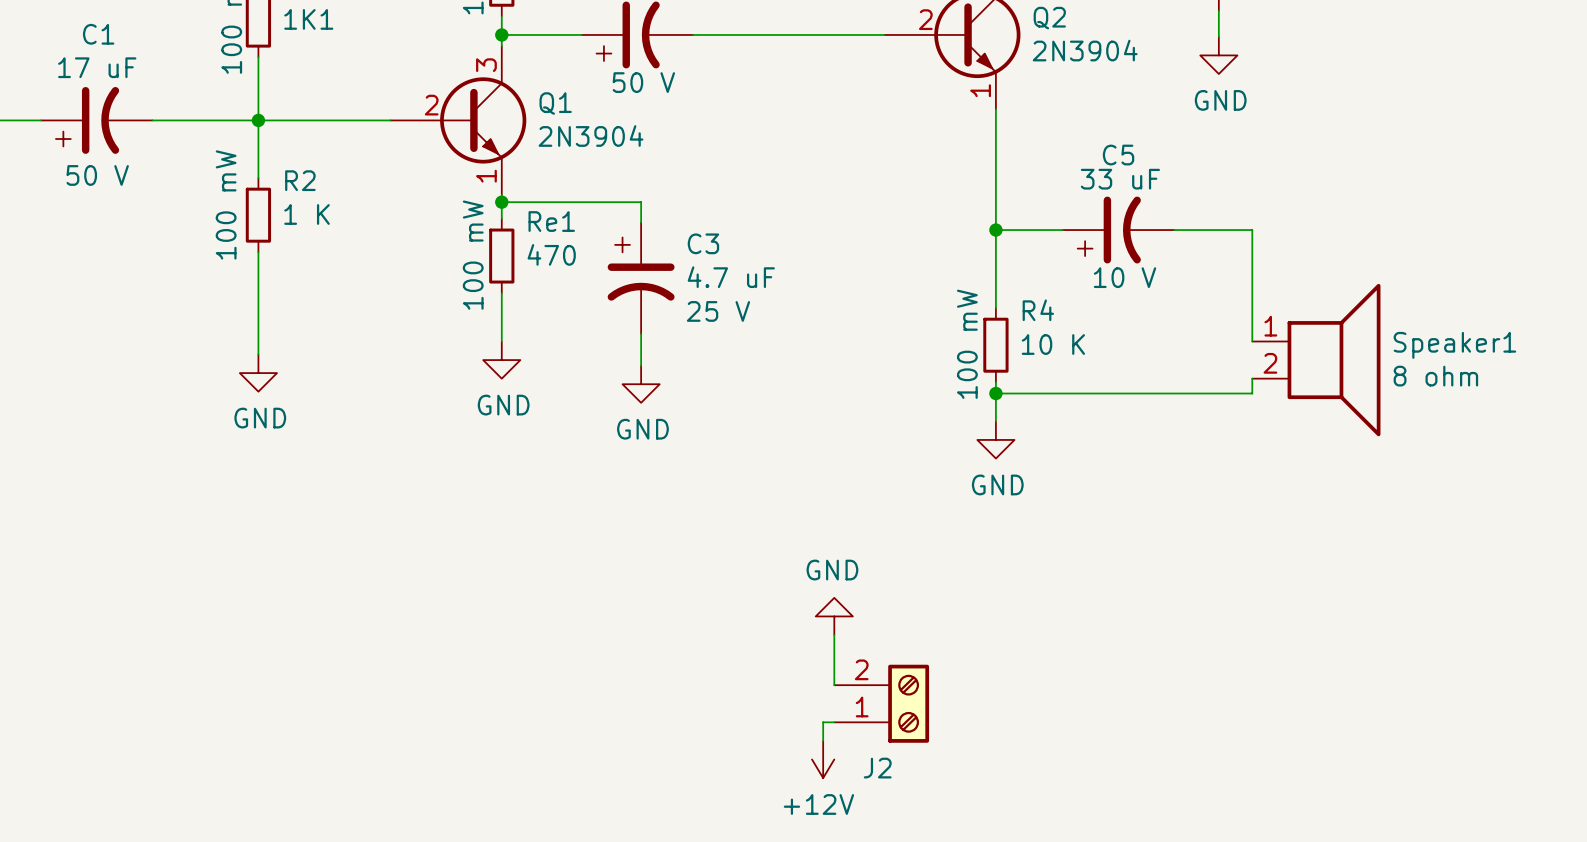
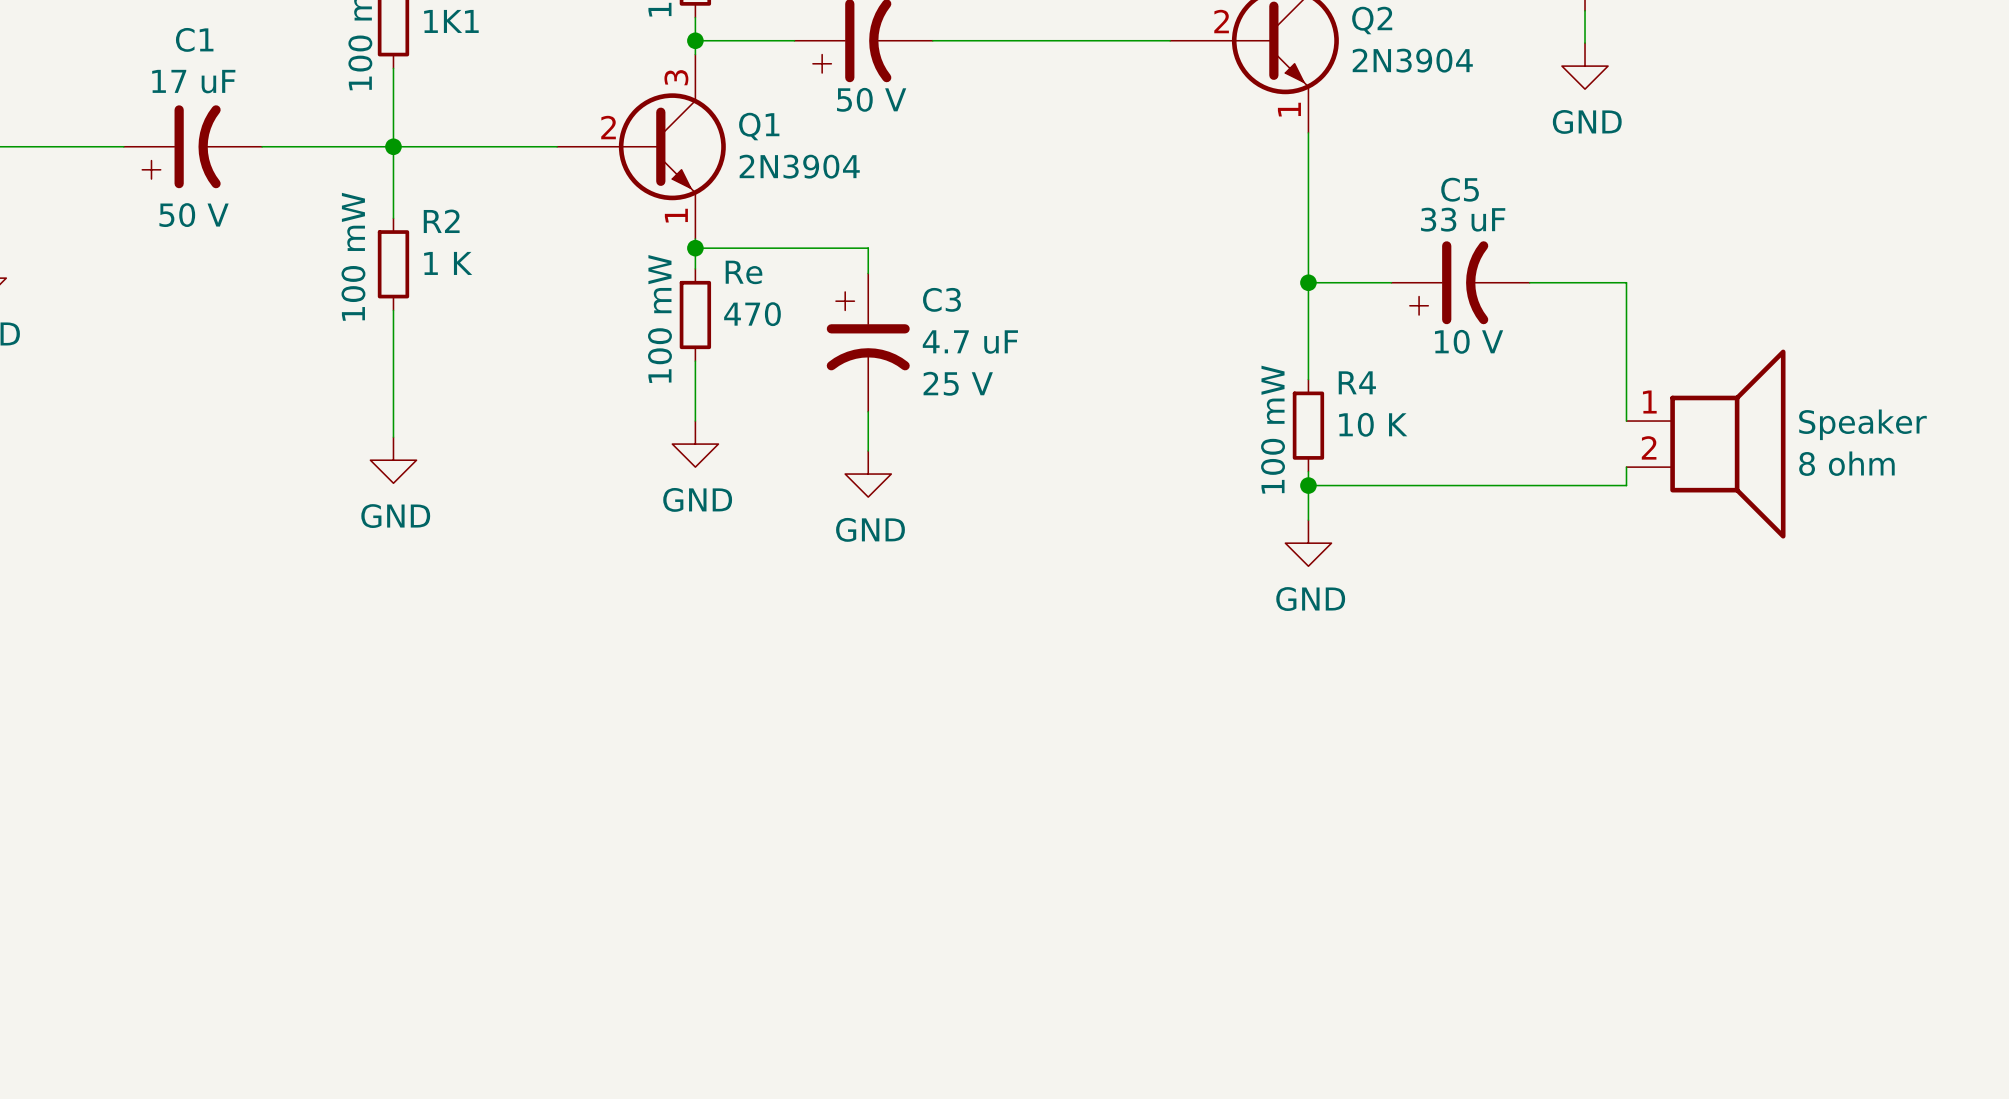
Re1 name: Re1 (551, 221) -> Re (744, 272)
Speaker1 name: Speaker1 (1454, 345) -> Speaker (1862, 424)
power symbol: GND (834, 616) -> none
wire: (834, 635) (834, 685) -> none
J2: (881, 703) -> none
wire: (834, 722) (823, 722) (823, 740) -> none
power symbol: +12V (823, 759) -> none

